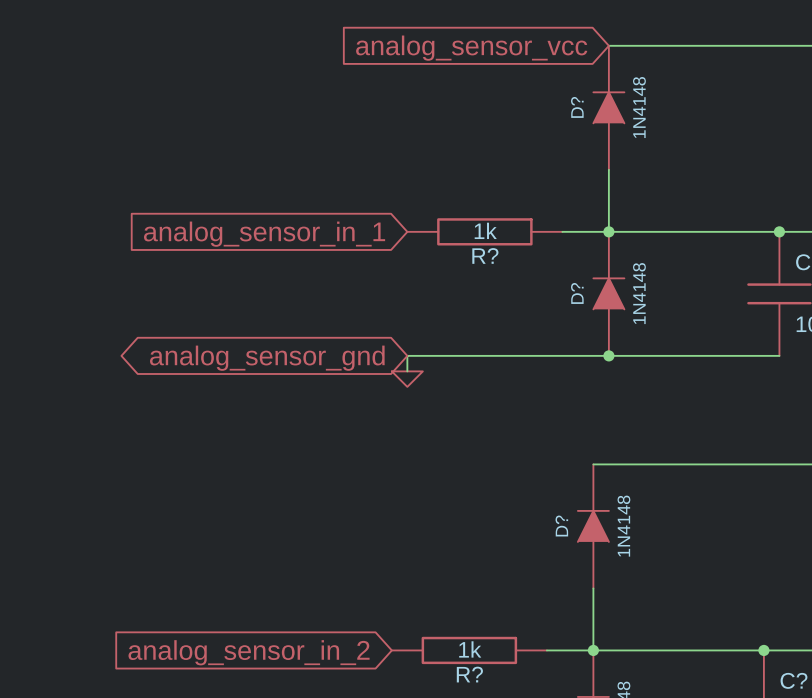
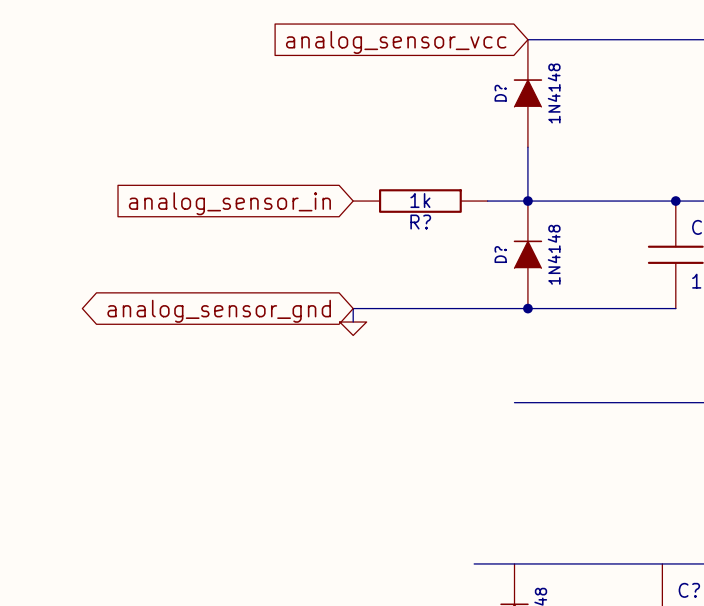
global label: analog_sensor_in_1 (264, 234) -> analog_sensor_in (229, 203)
D?: 1N4148 (593, 526) -> none
wire: (593, 588) (593, 650) -> none
R?: 1k (469, 650) -> none
junction: (593, 650) -> none
junction: (763, 650) -> none
global label: analog_sensor_in_2 (249, 652) -> none

